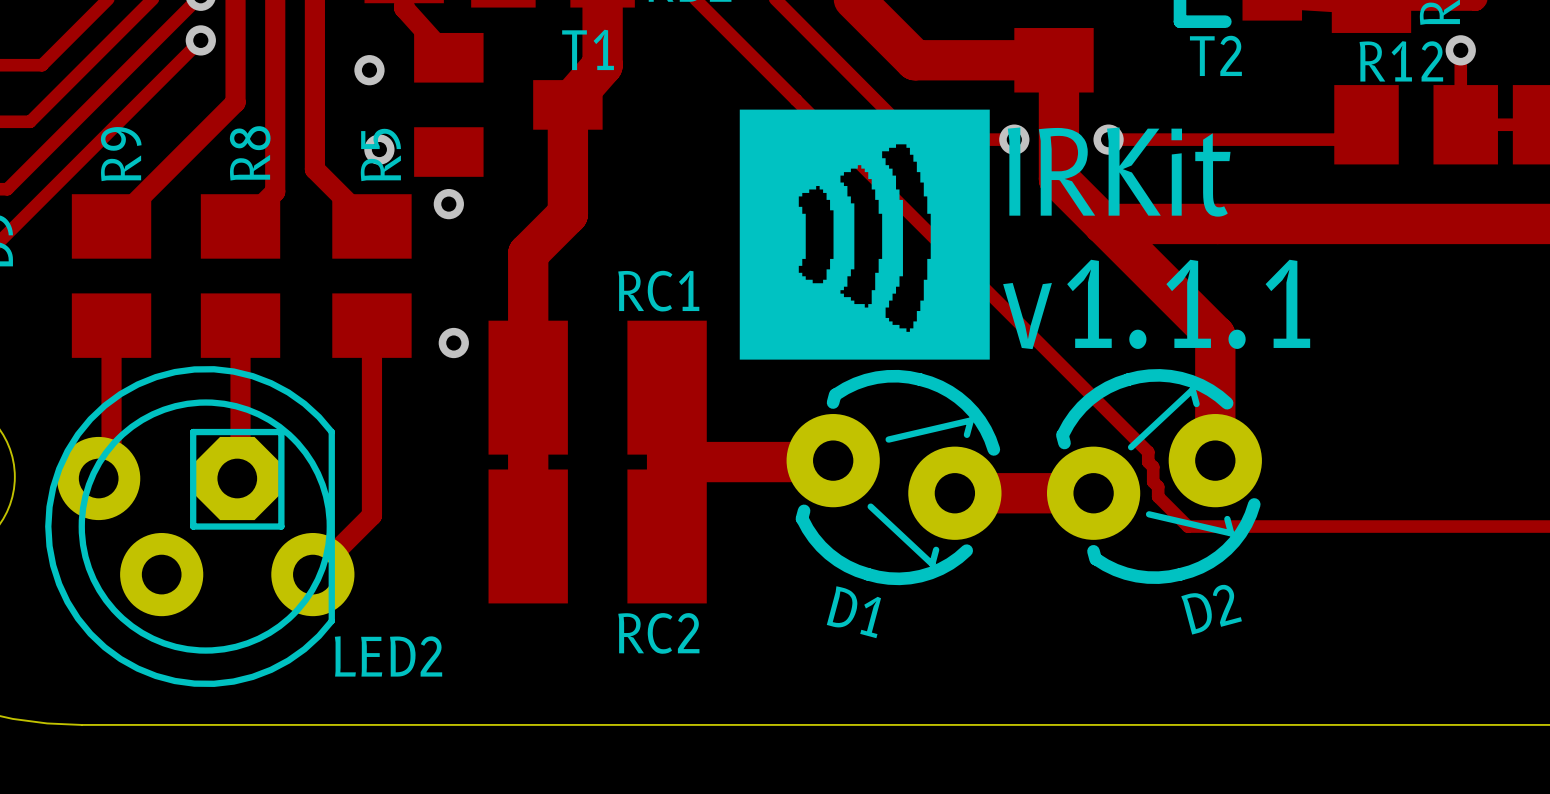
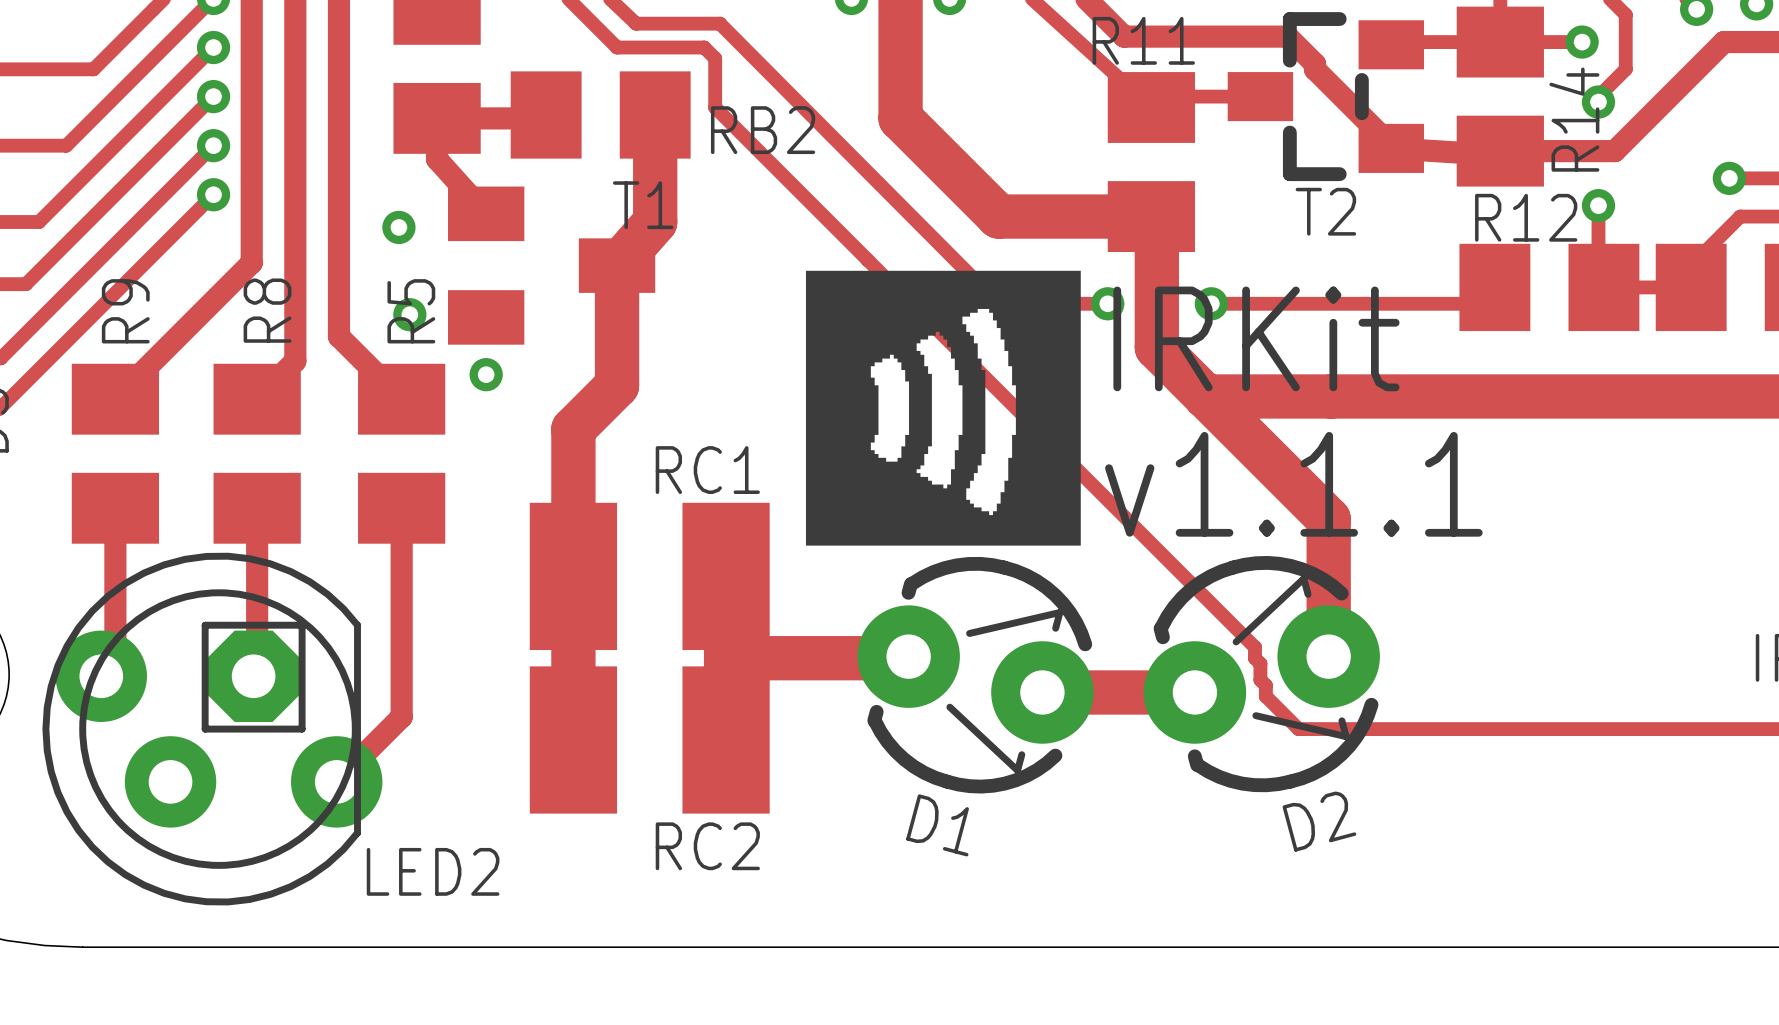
via: (453, 343) -> none

